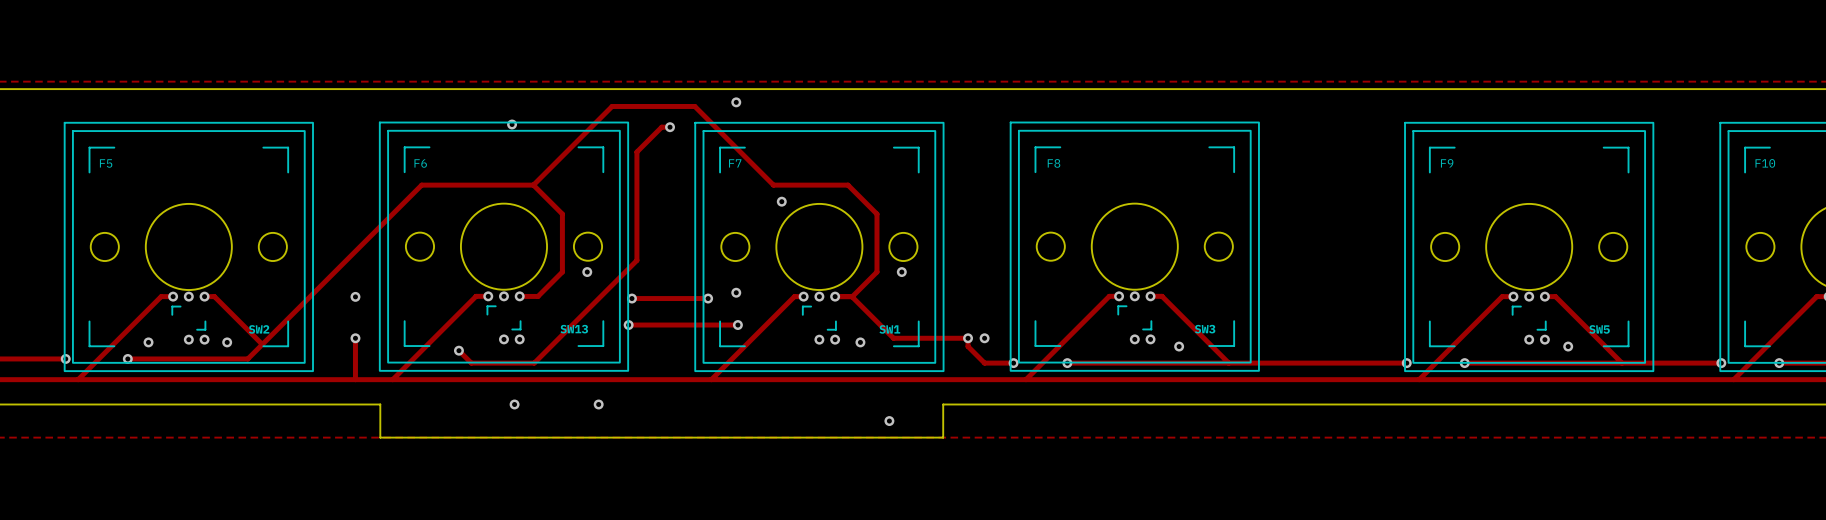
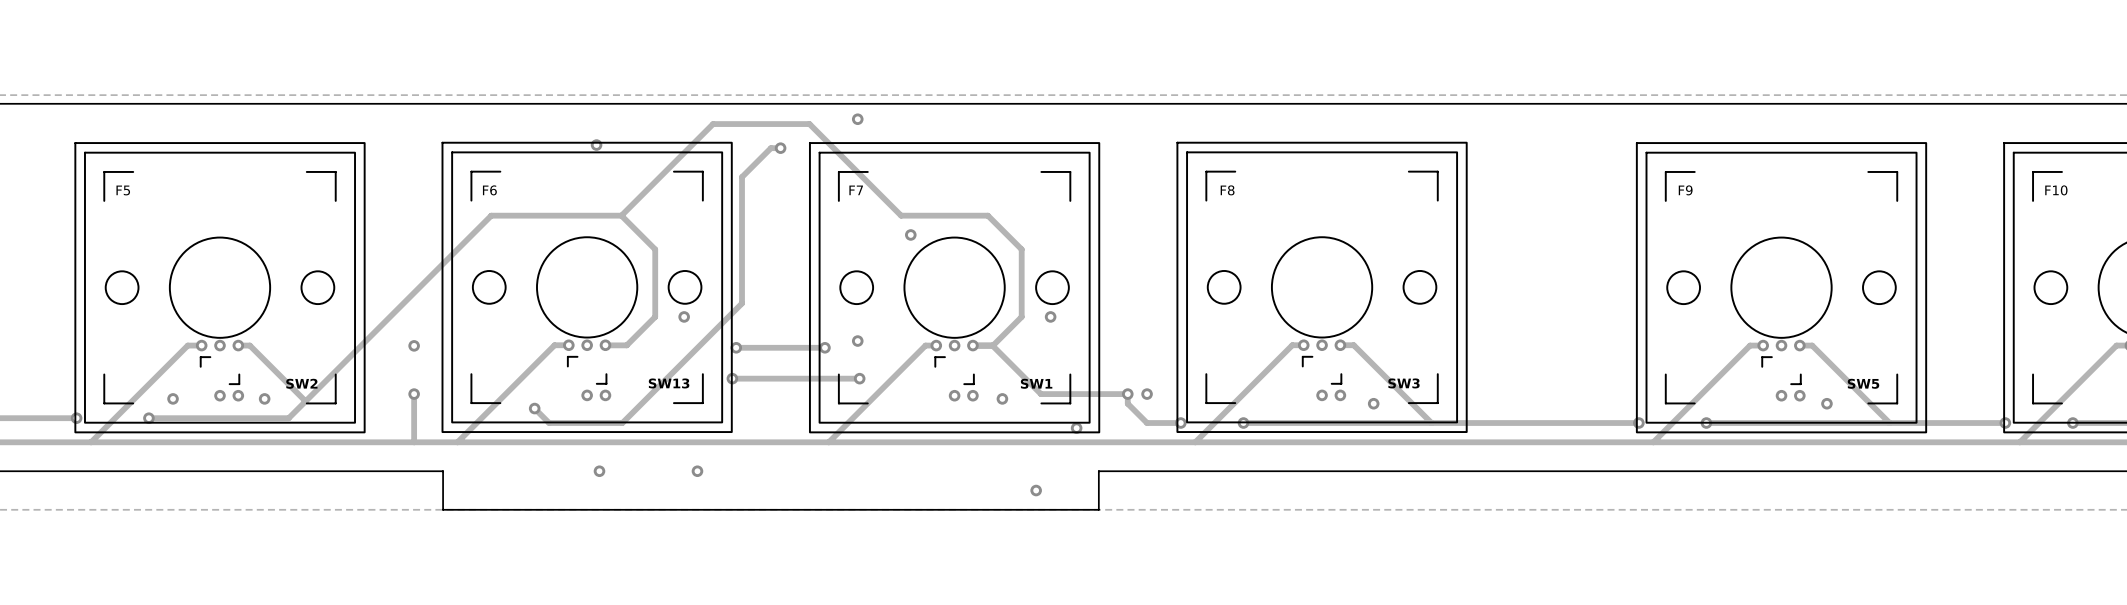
via: none -> (1076, 428)

